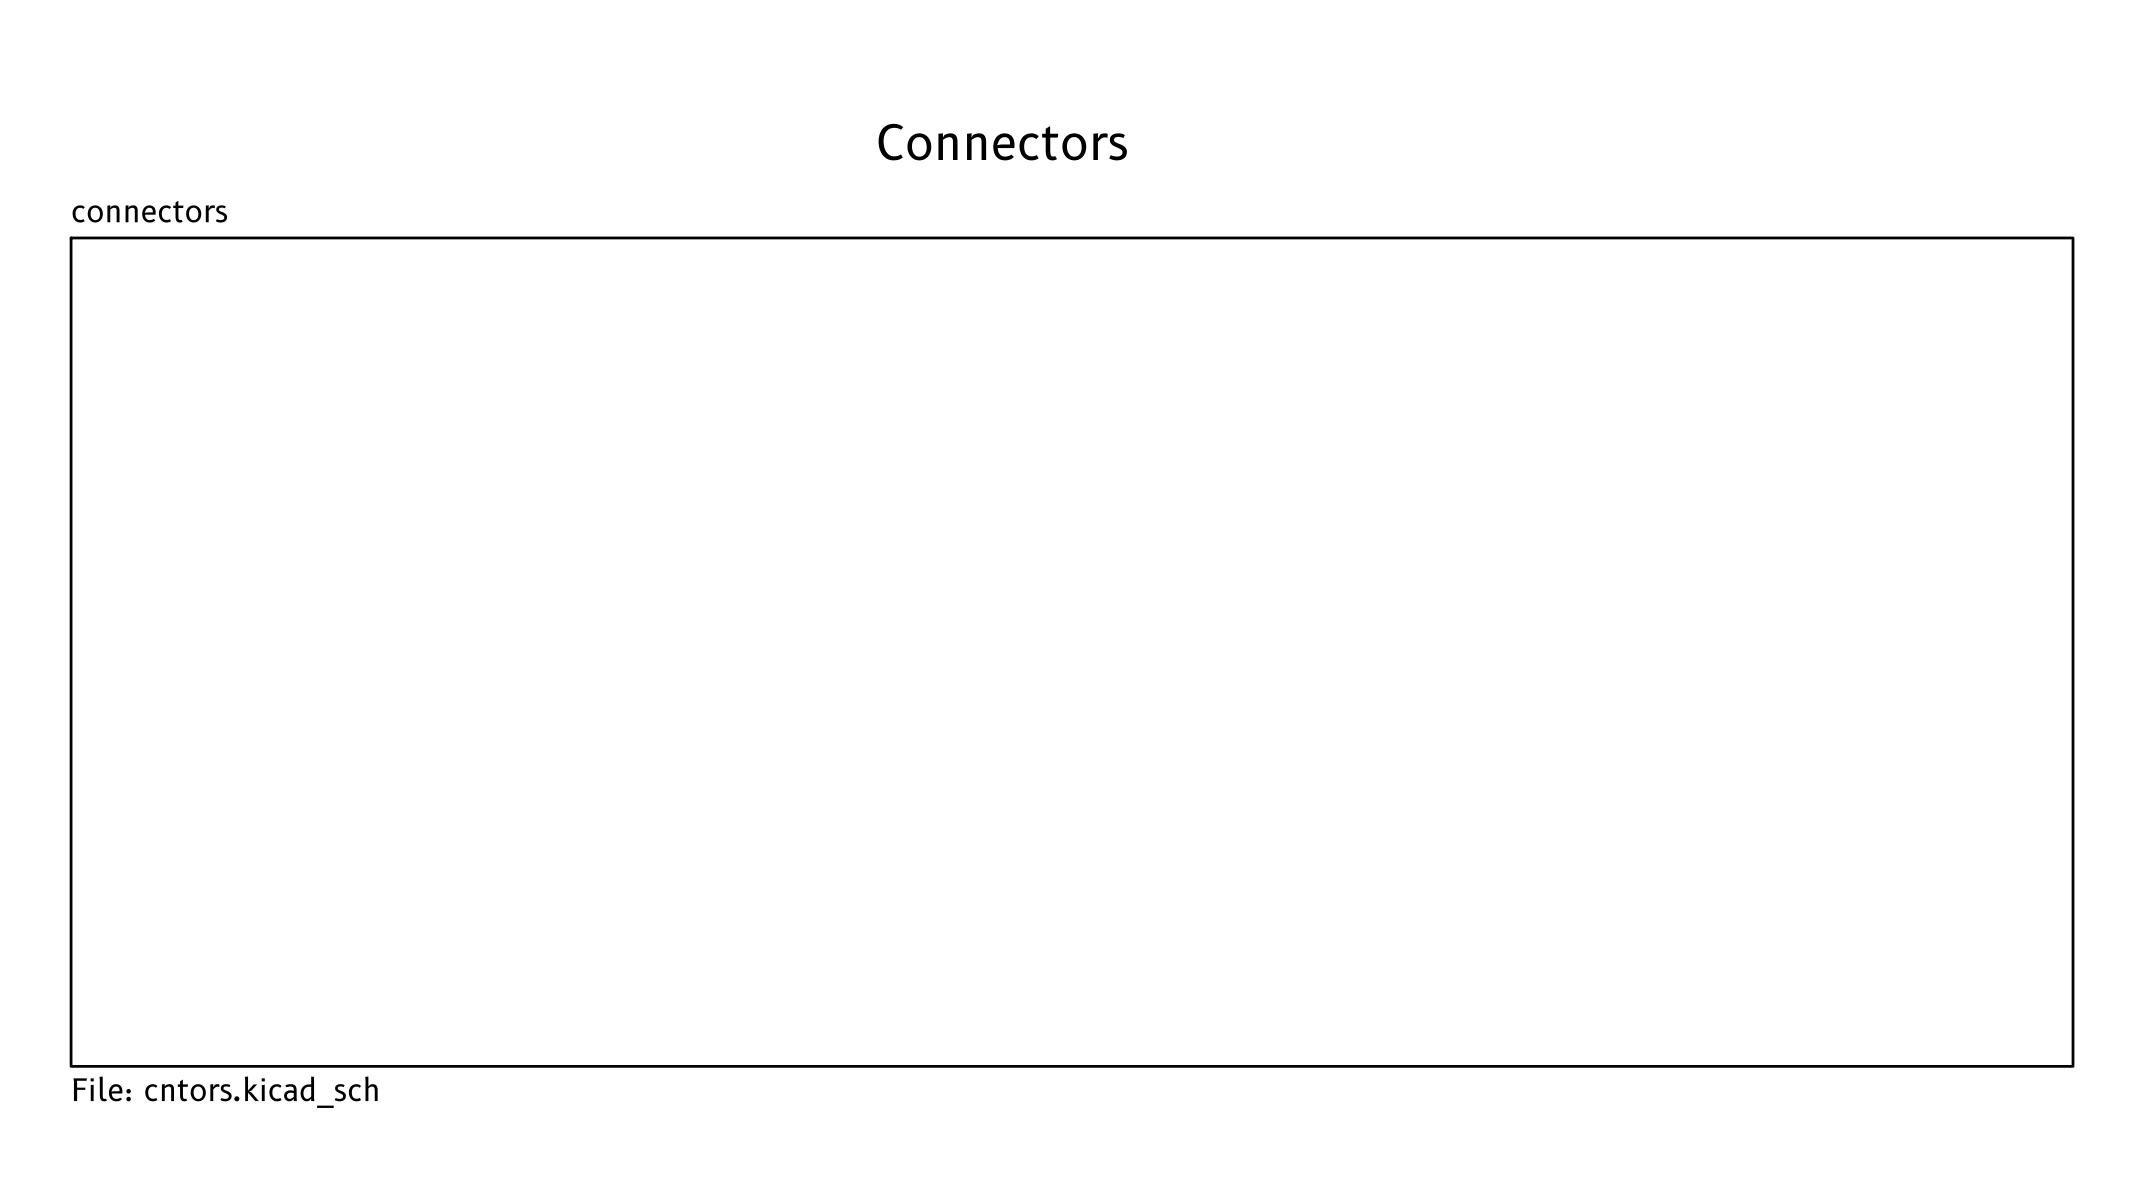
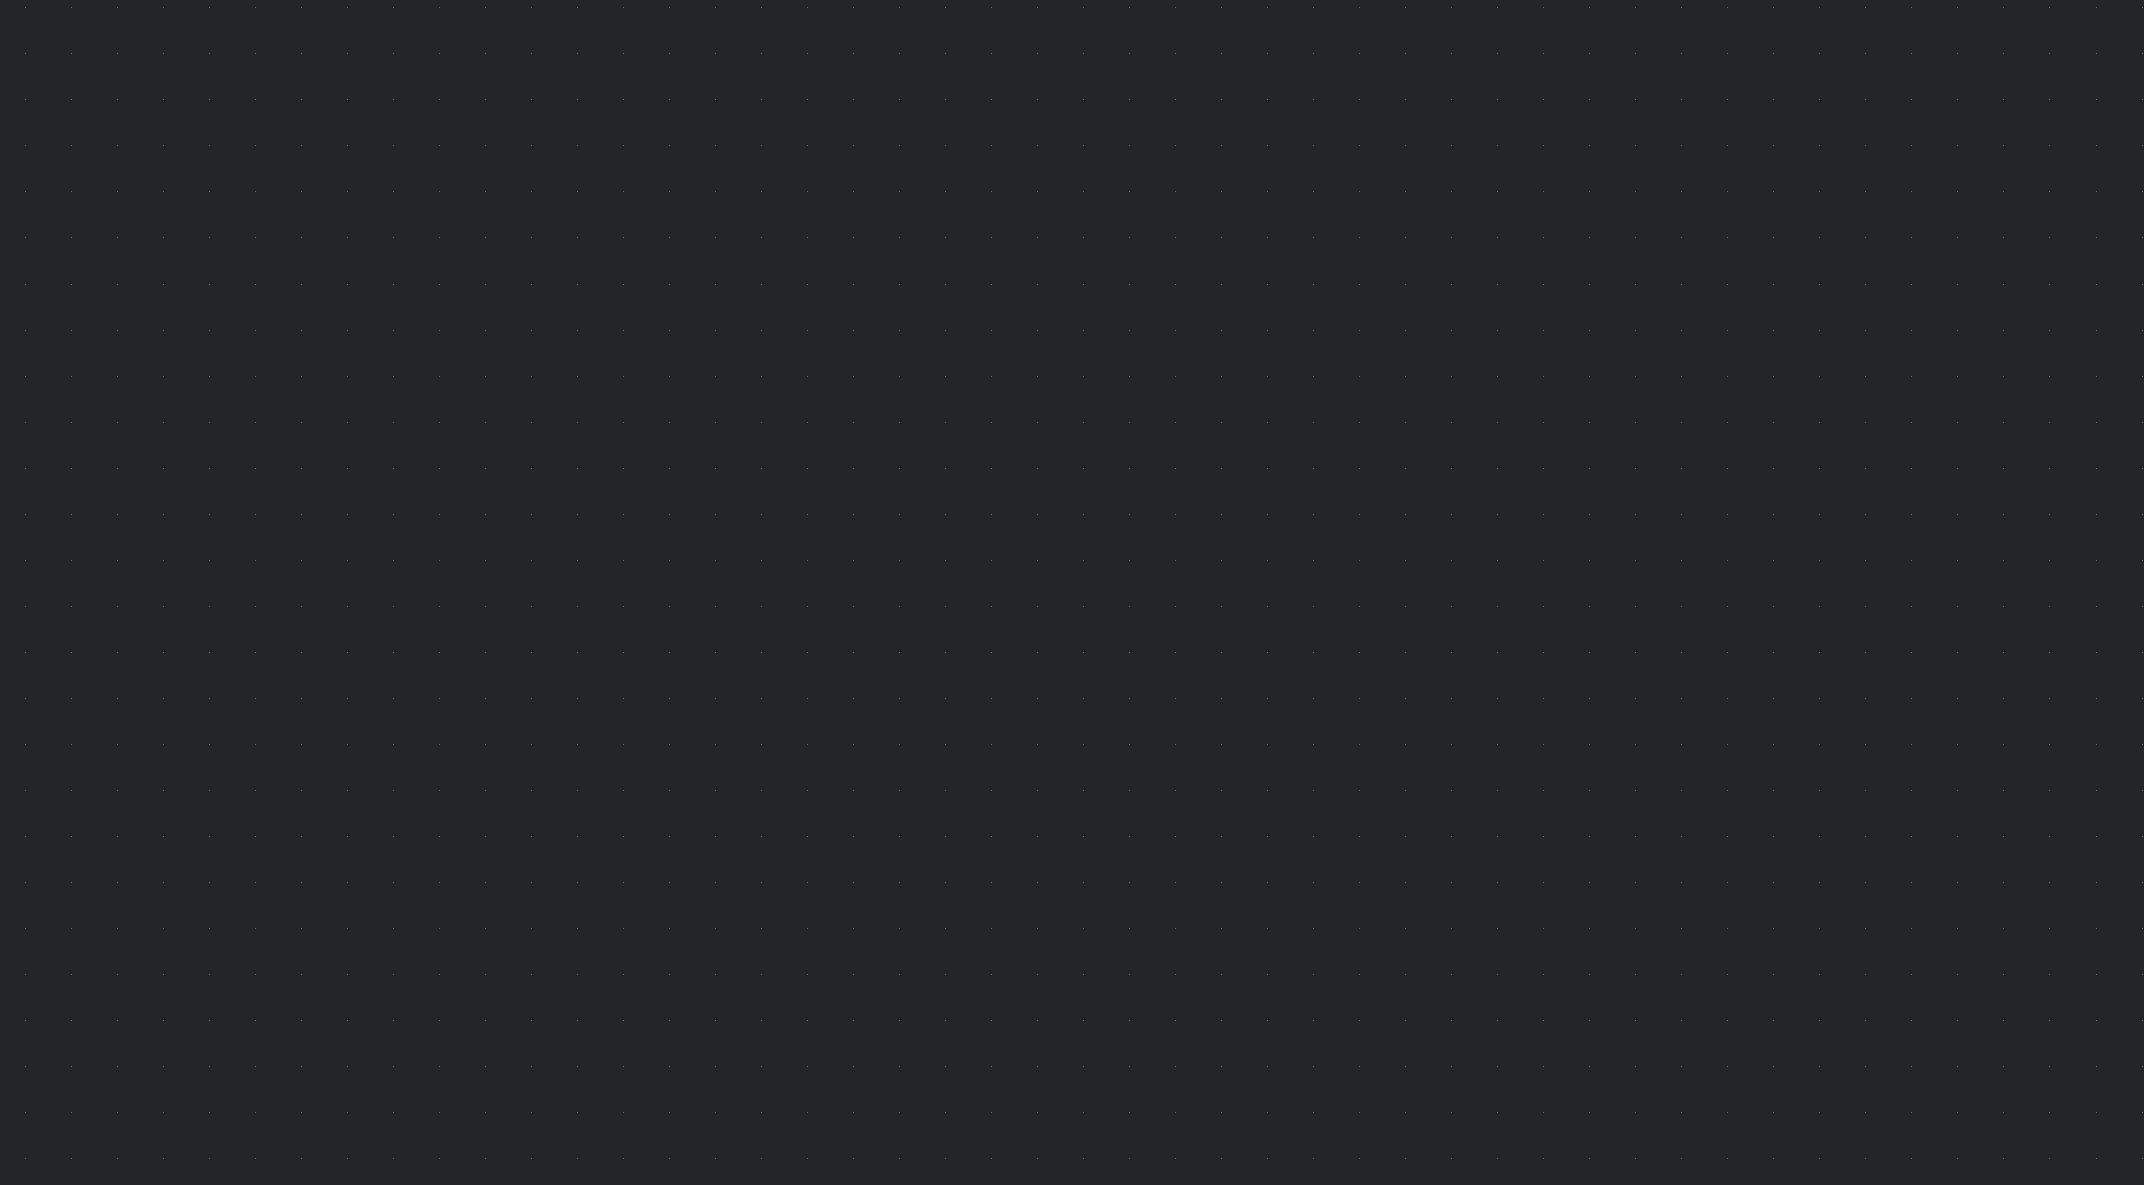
text: Connectors (1002, 142) -> none
sheet connectors: File: cntors.kicad_sch (1072, 652) -> none

